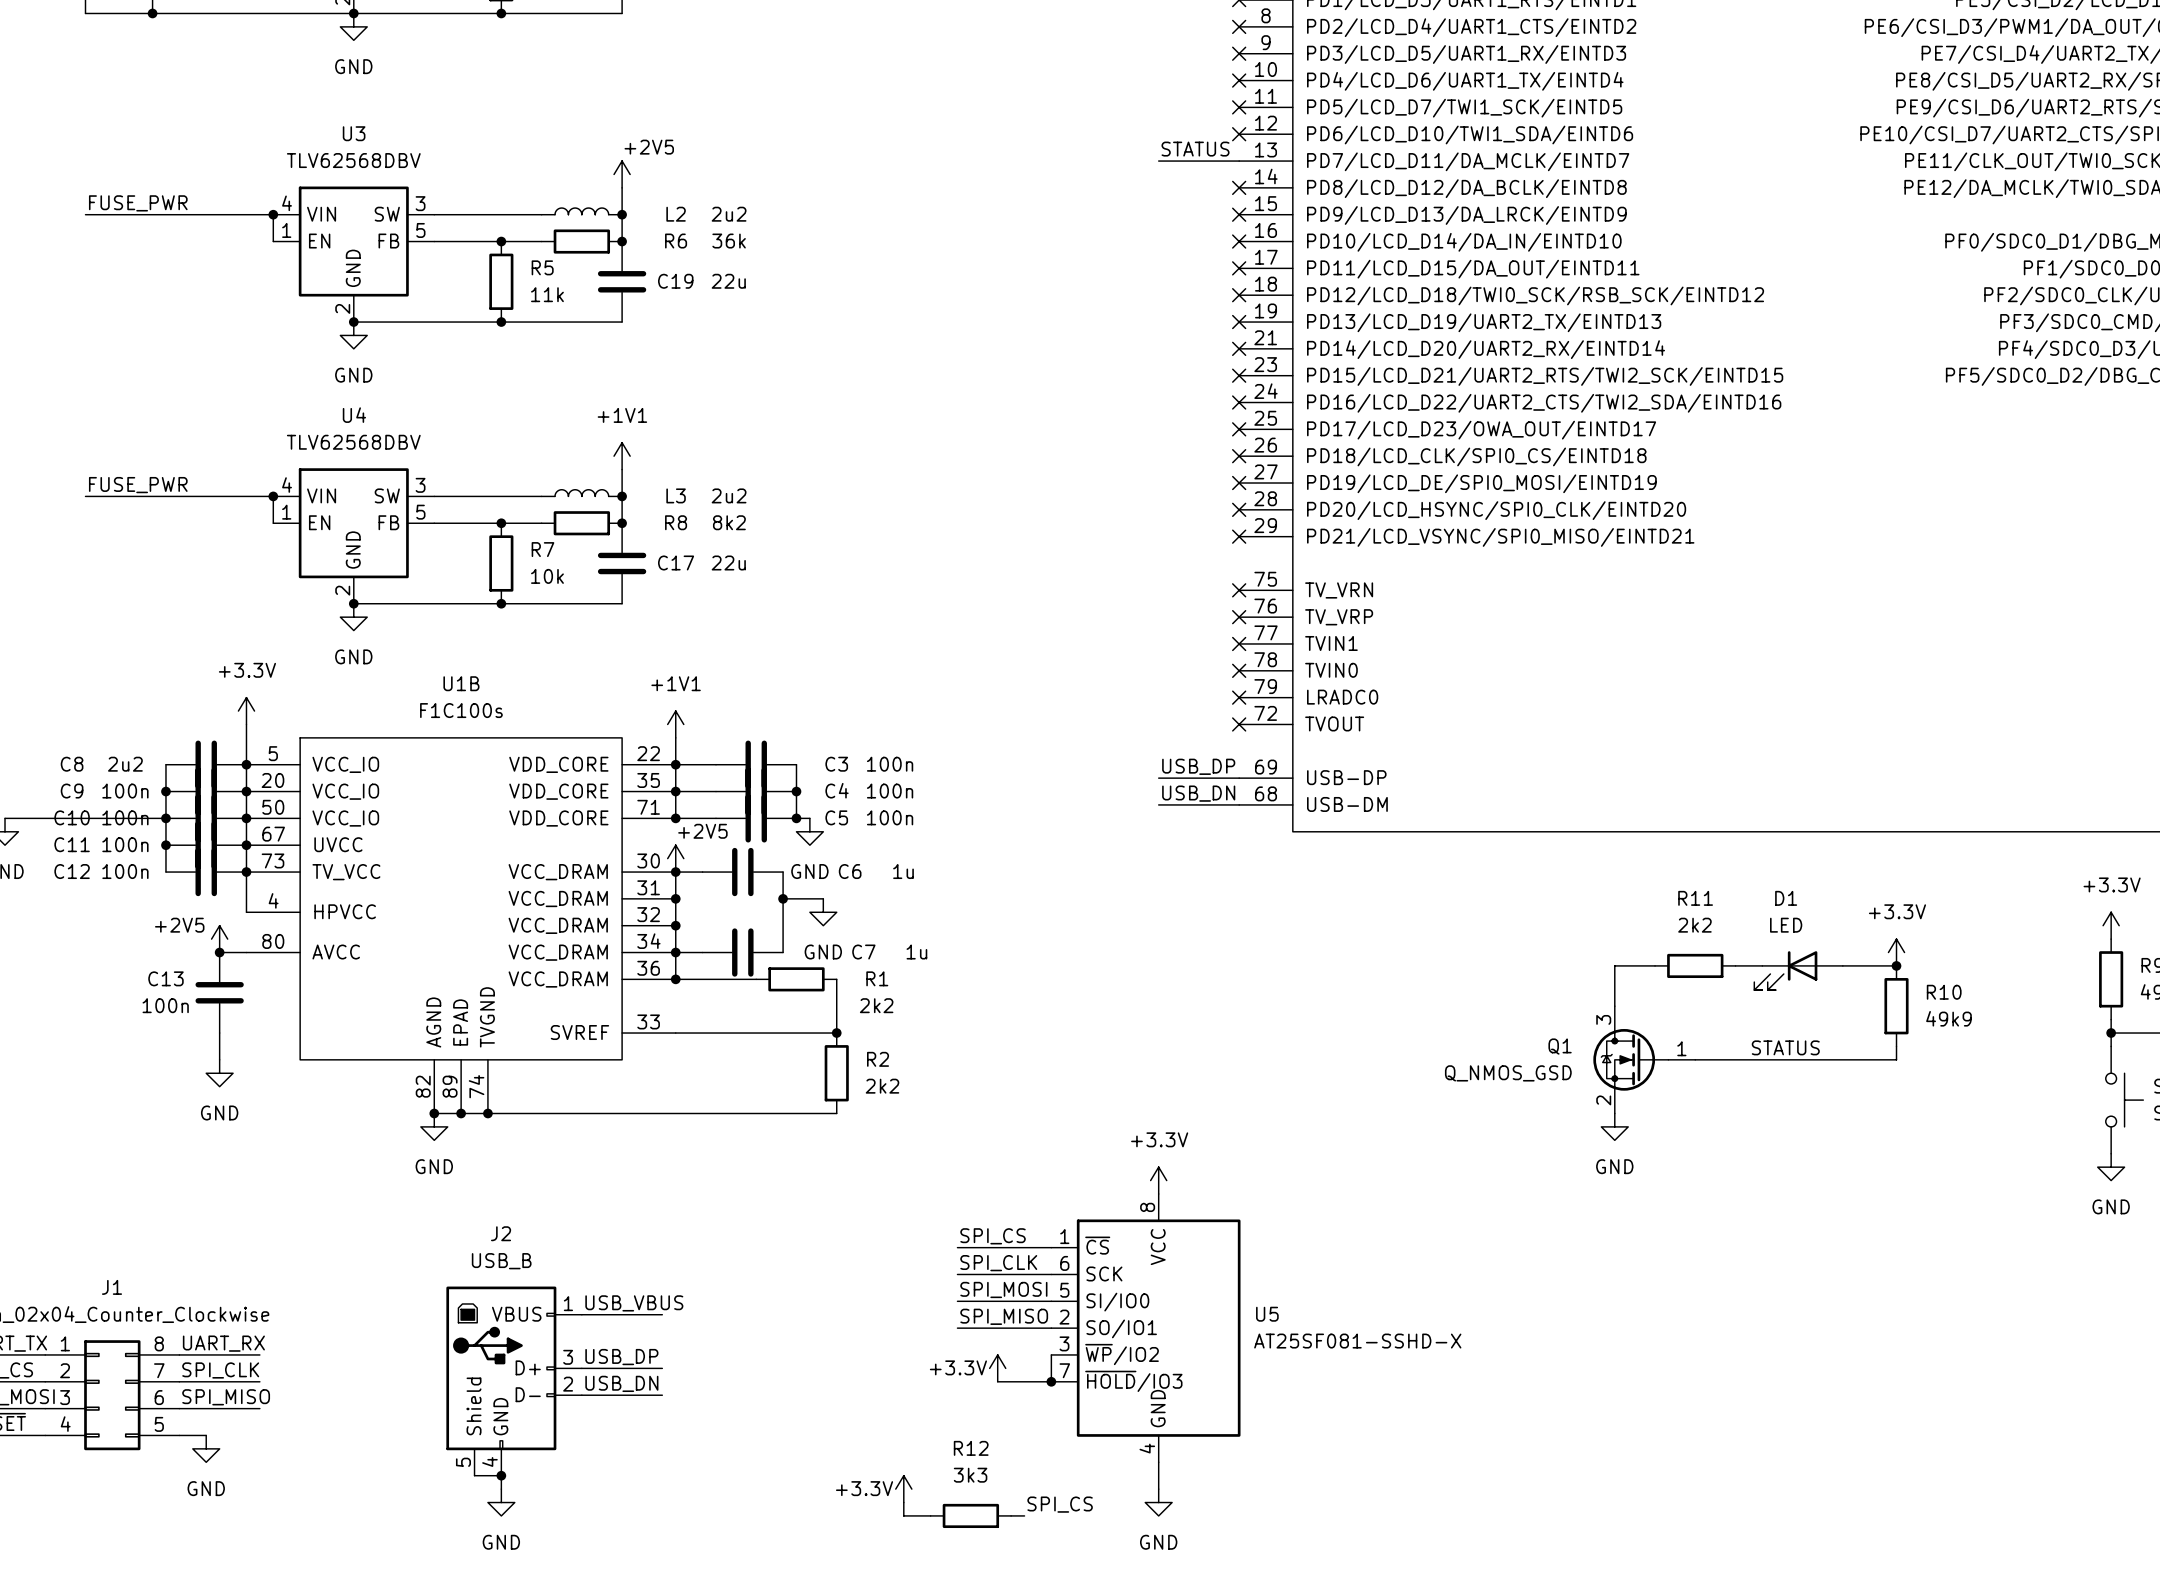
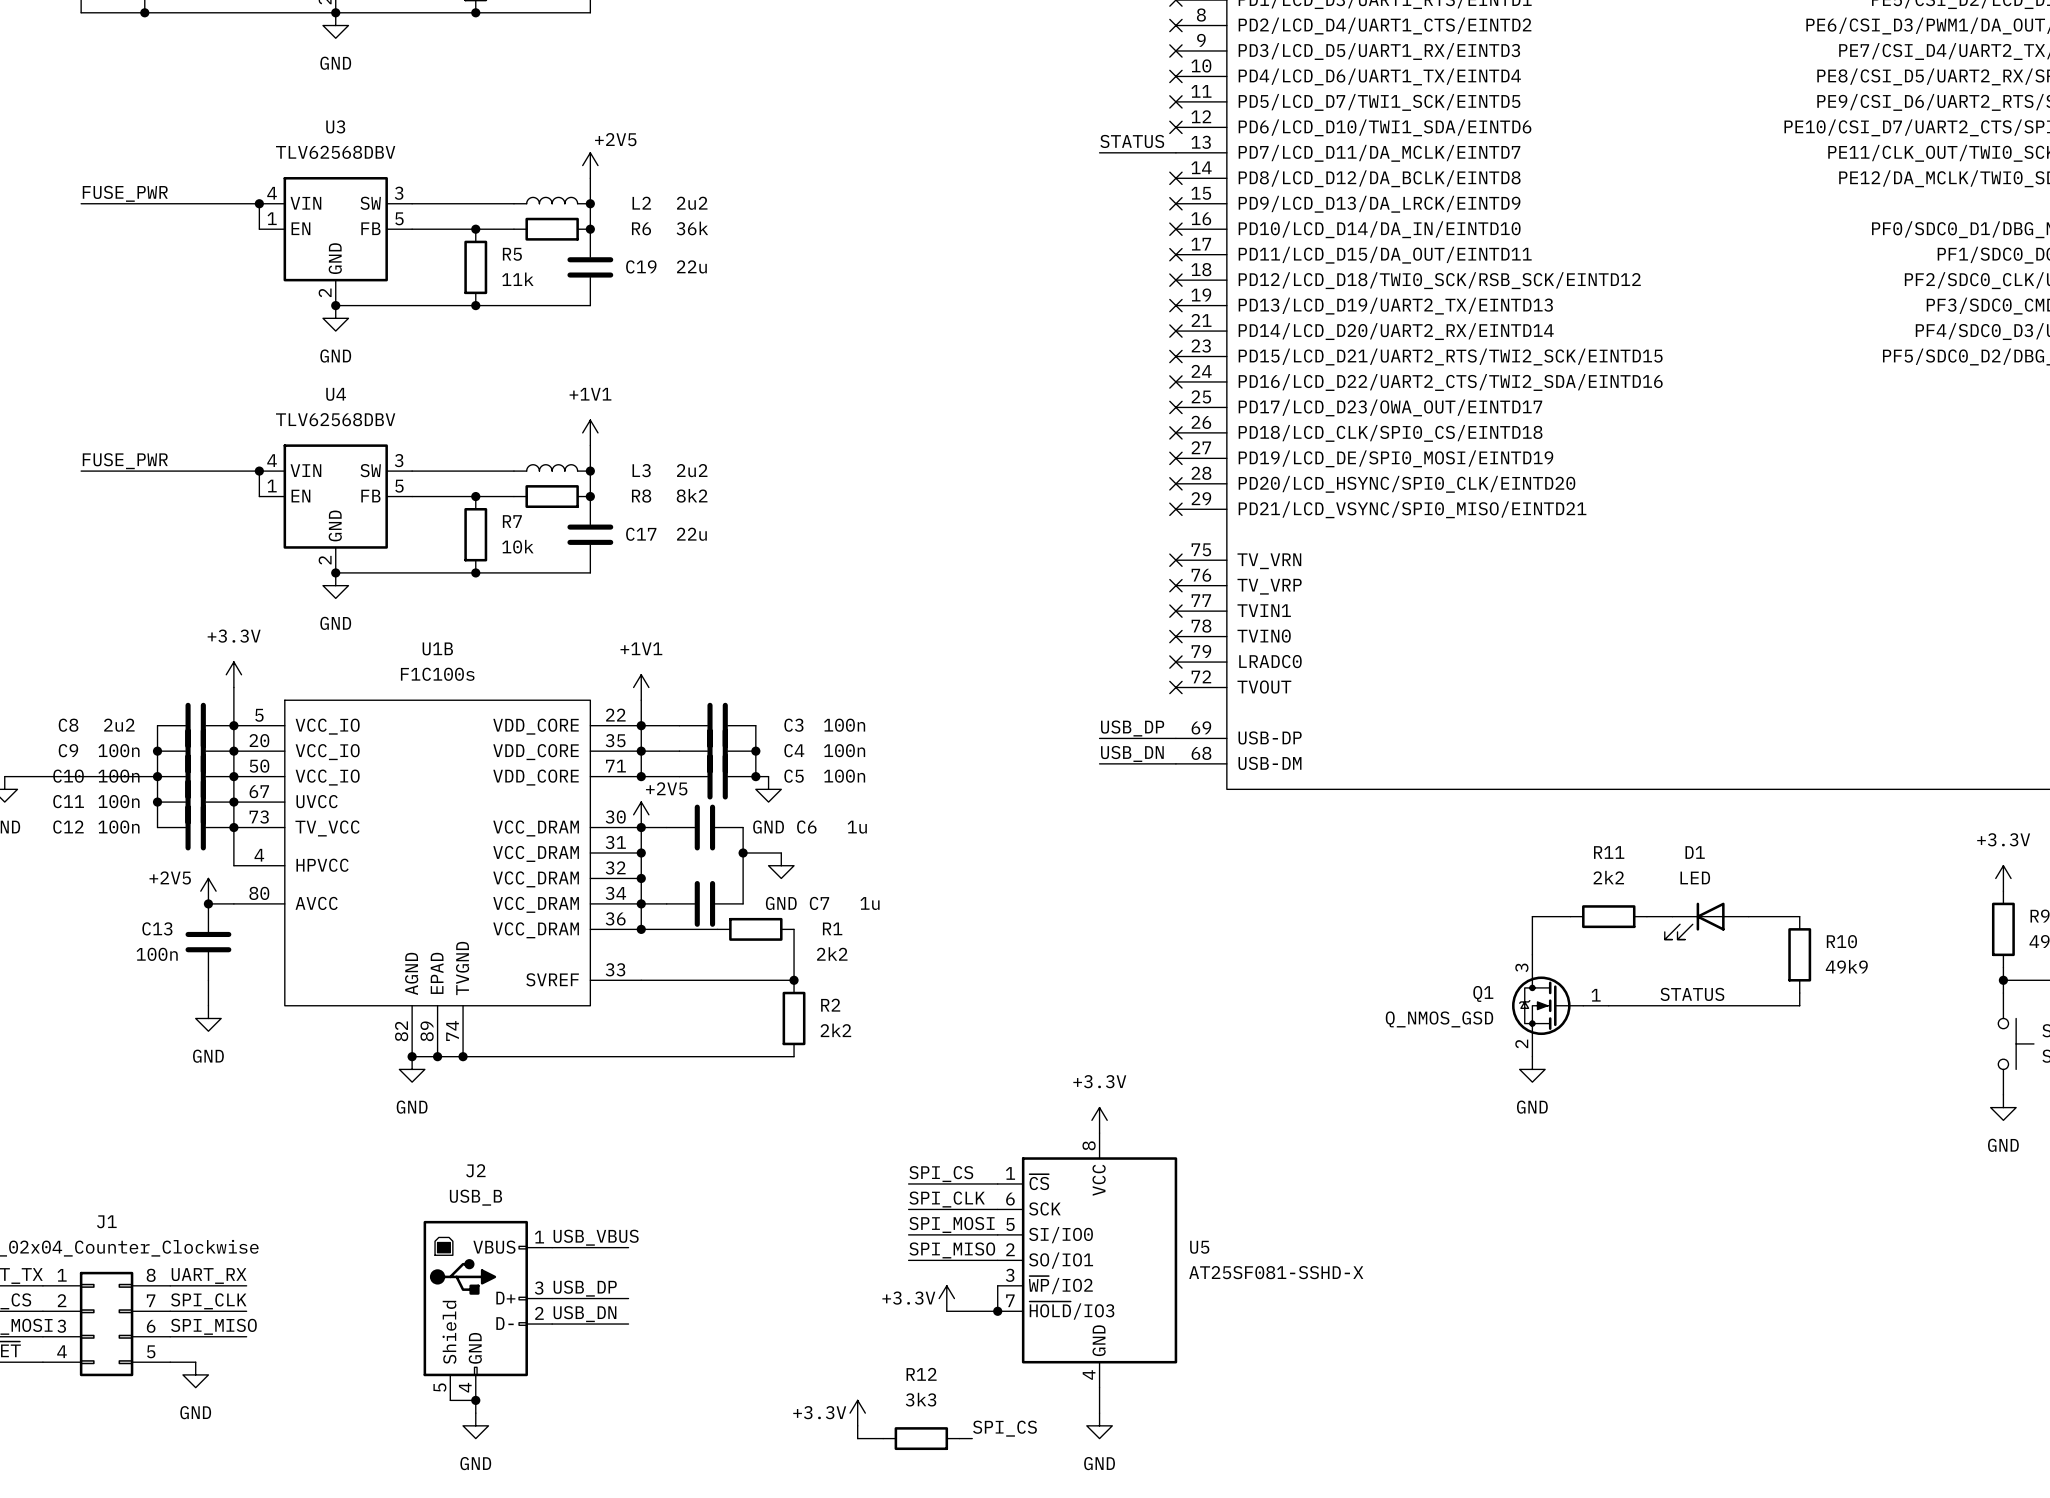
power symbol: +3.3V (1896, 952) -> none
junction: (1896, 965) -> none

